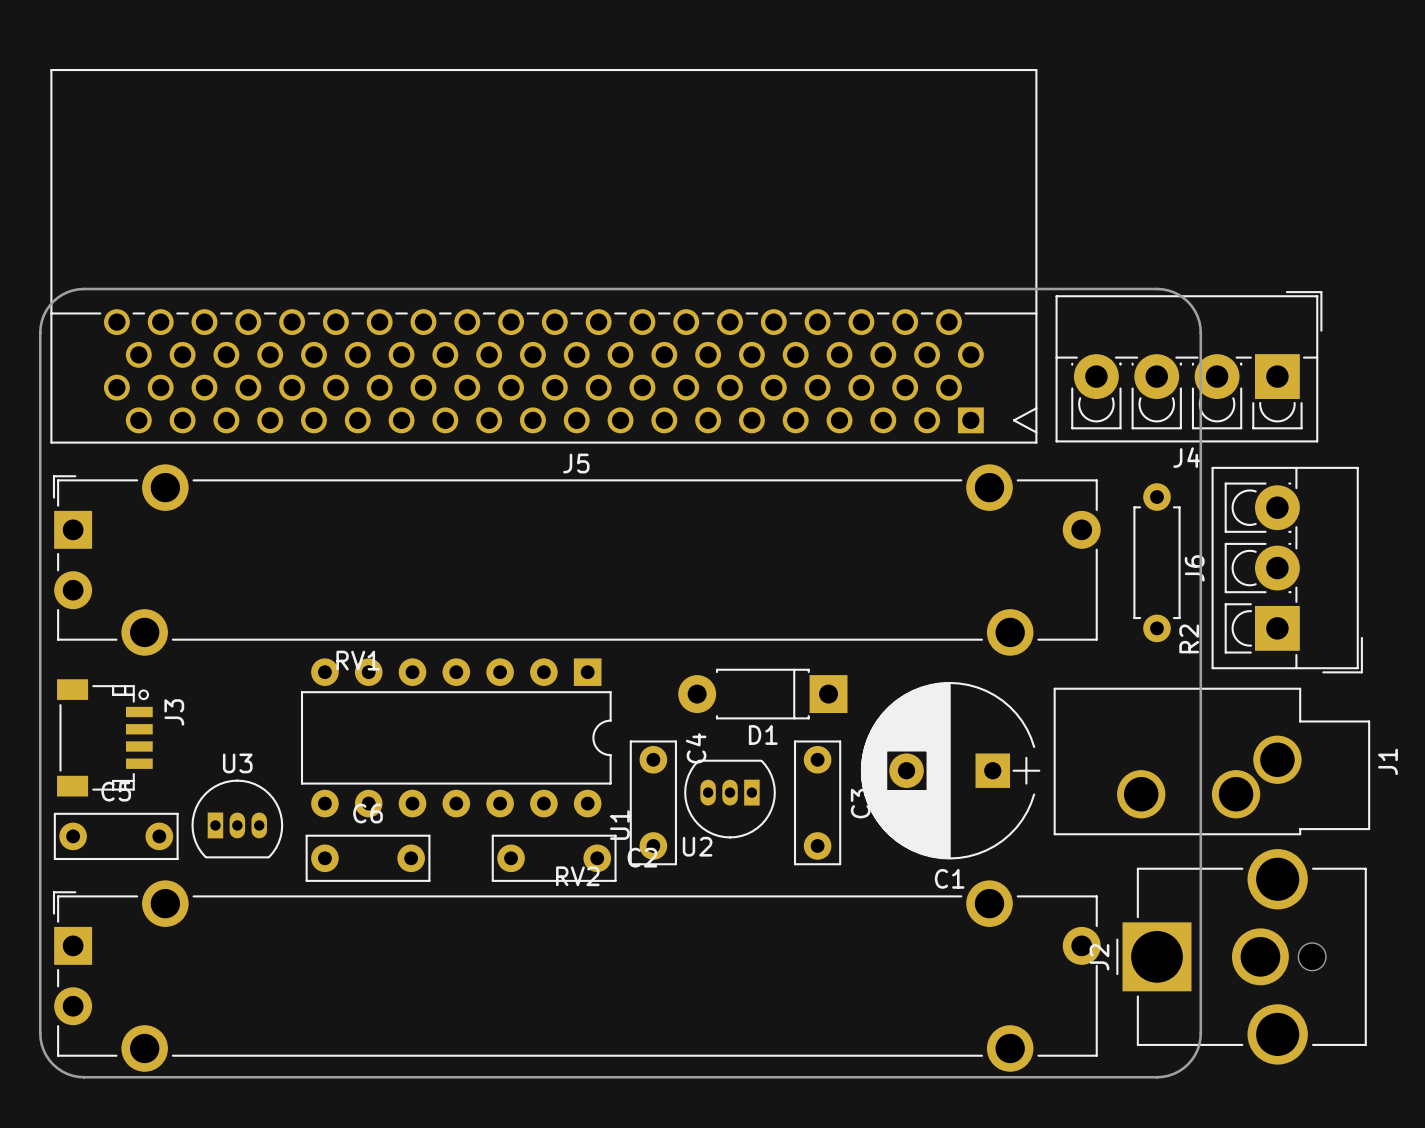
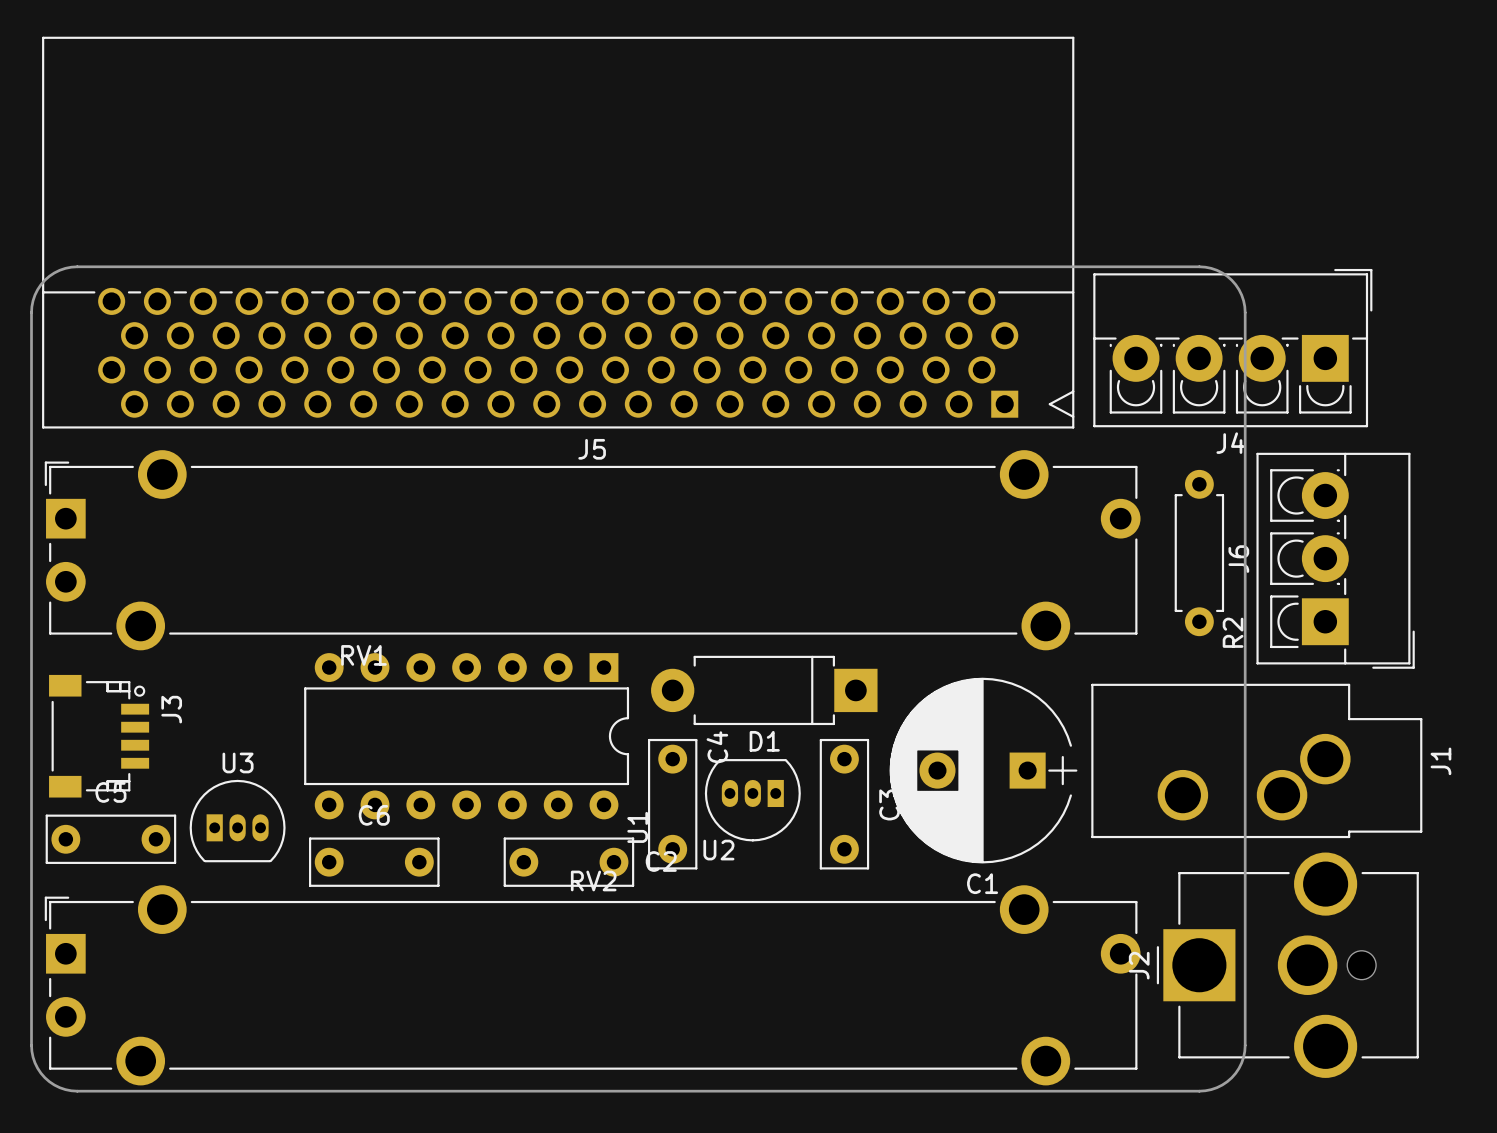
D1 footprint: [678, 668, 848, 720] -> [651, 655, 878, 726]

